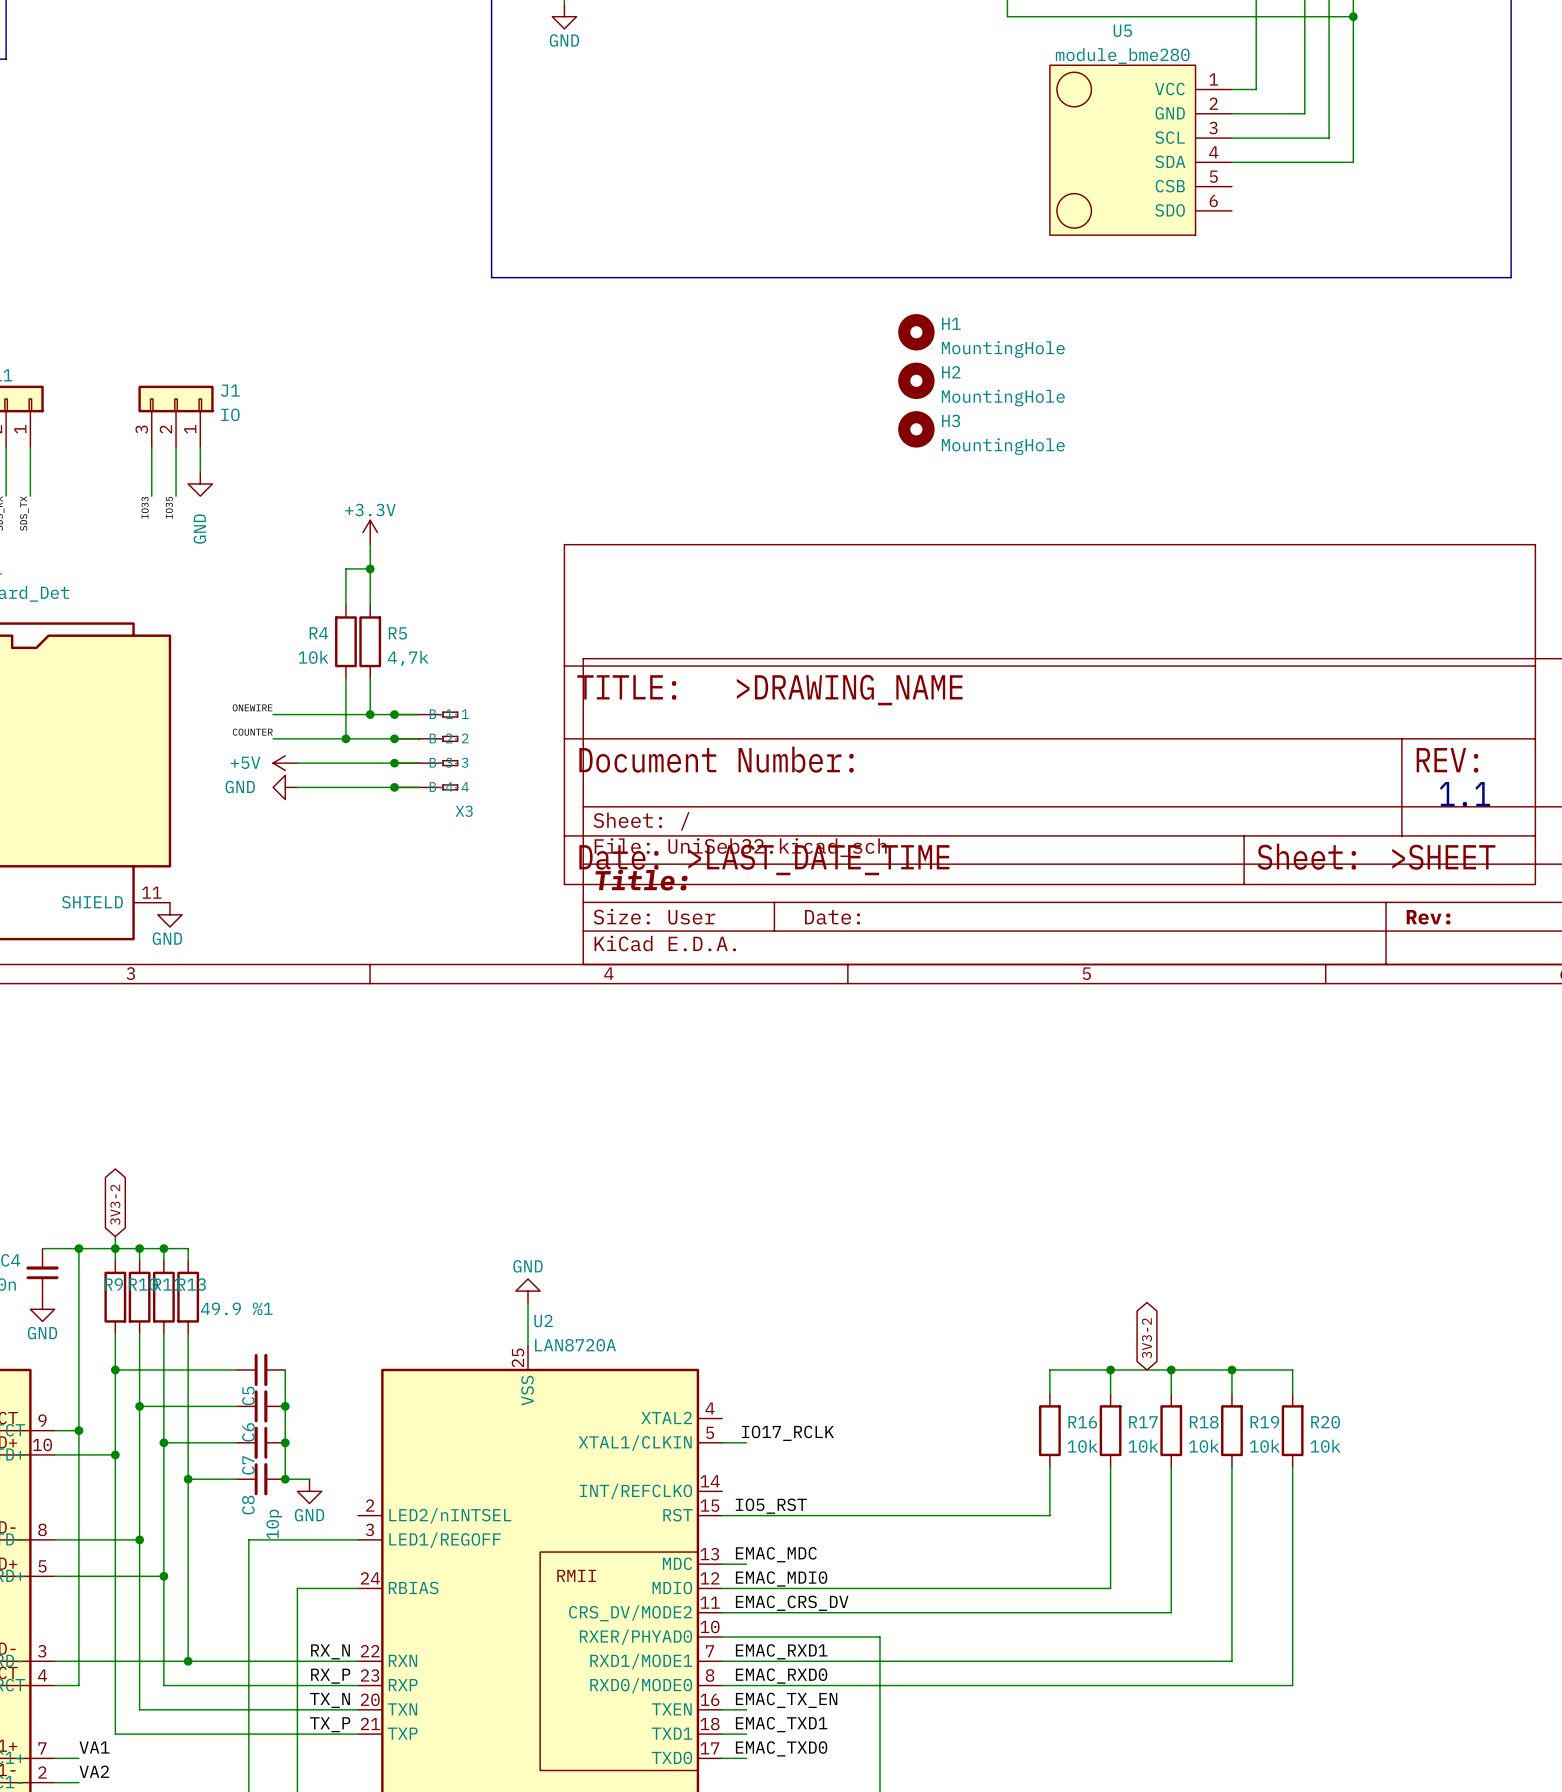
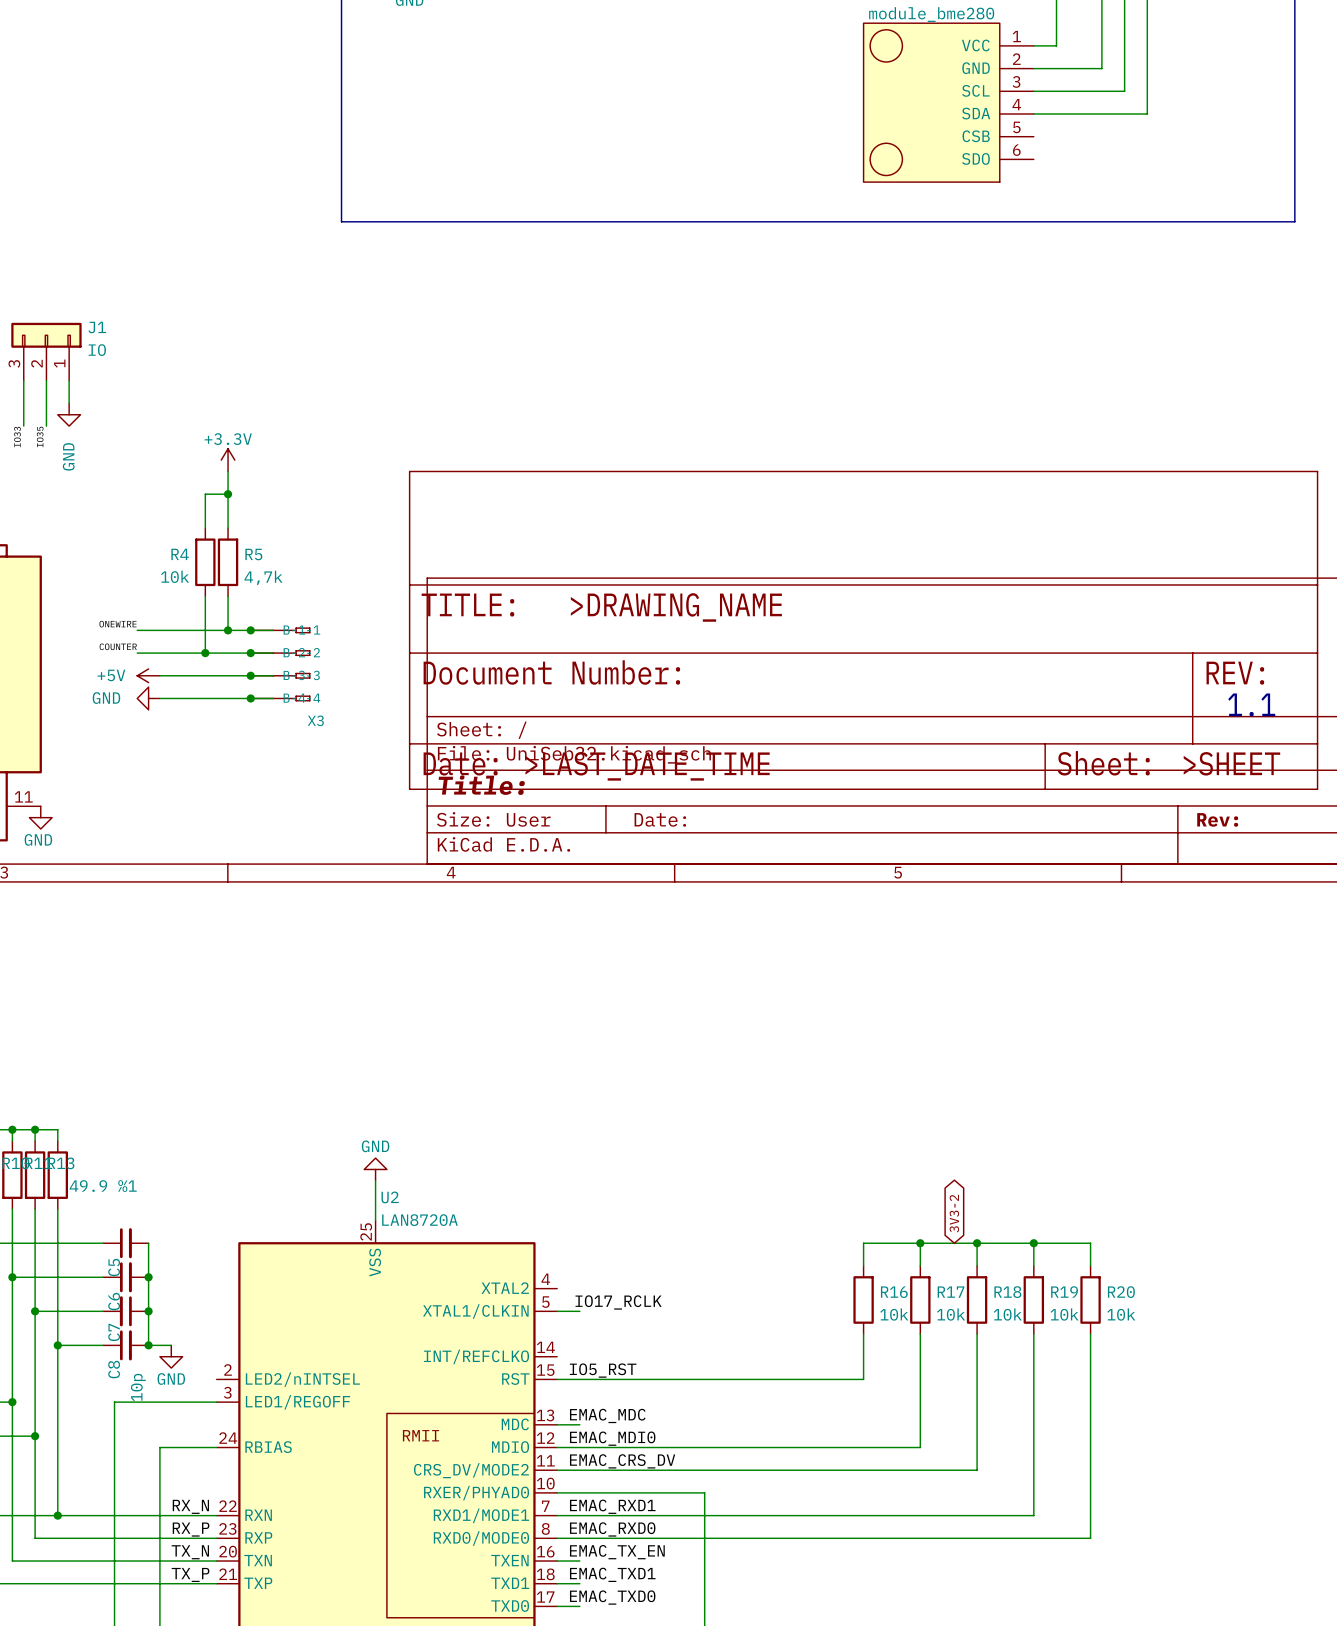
H1: MountingHole (916, 332) -> none
H2: MountingHole (916, 380) -> none
H3: MountingHole (916, 429) -> none

